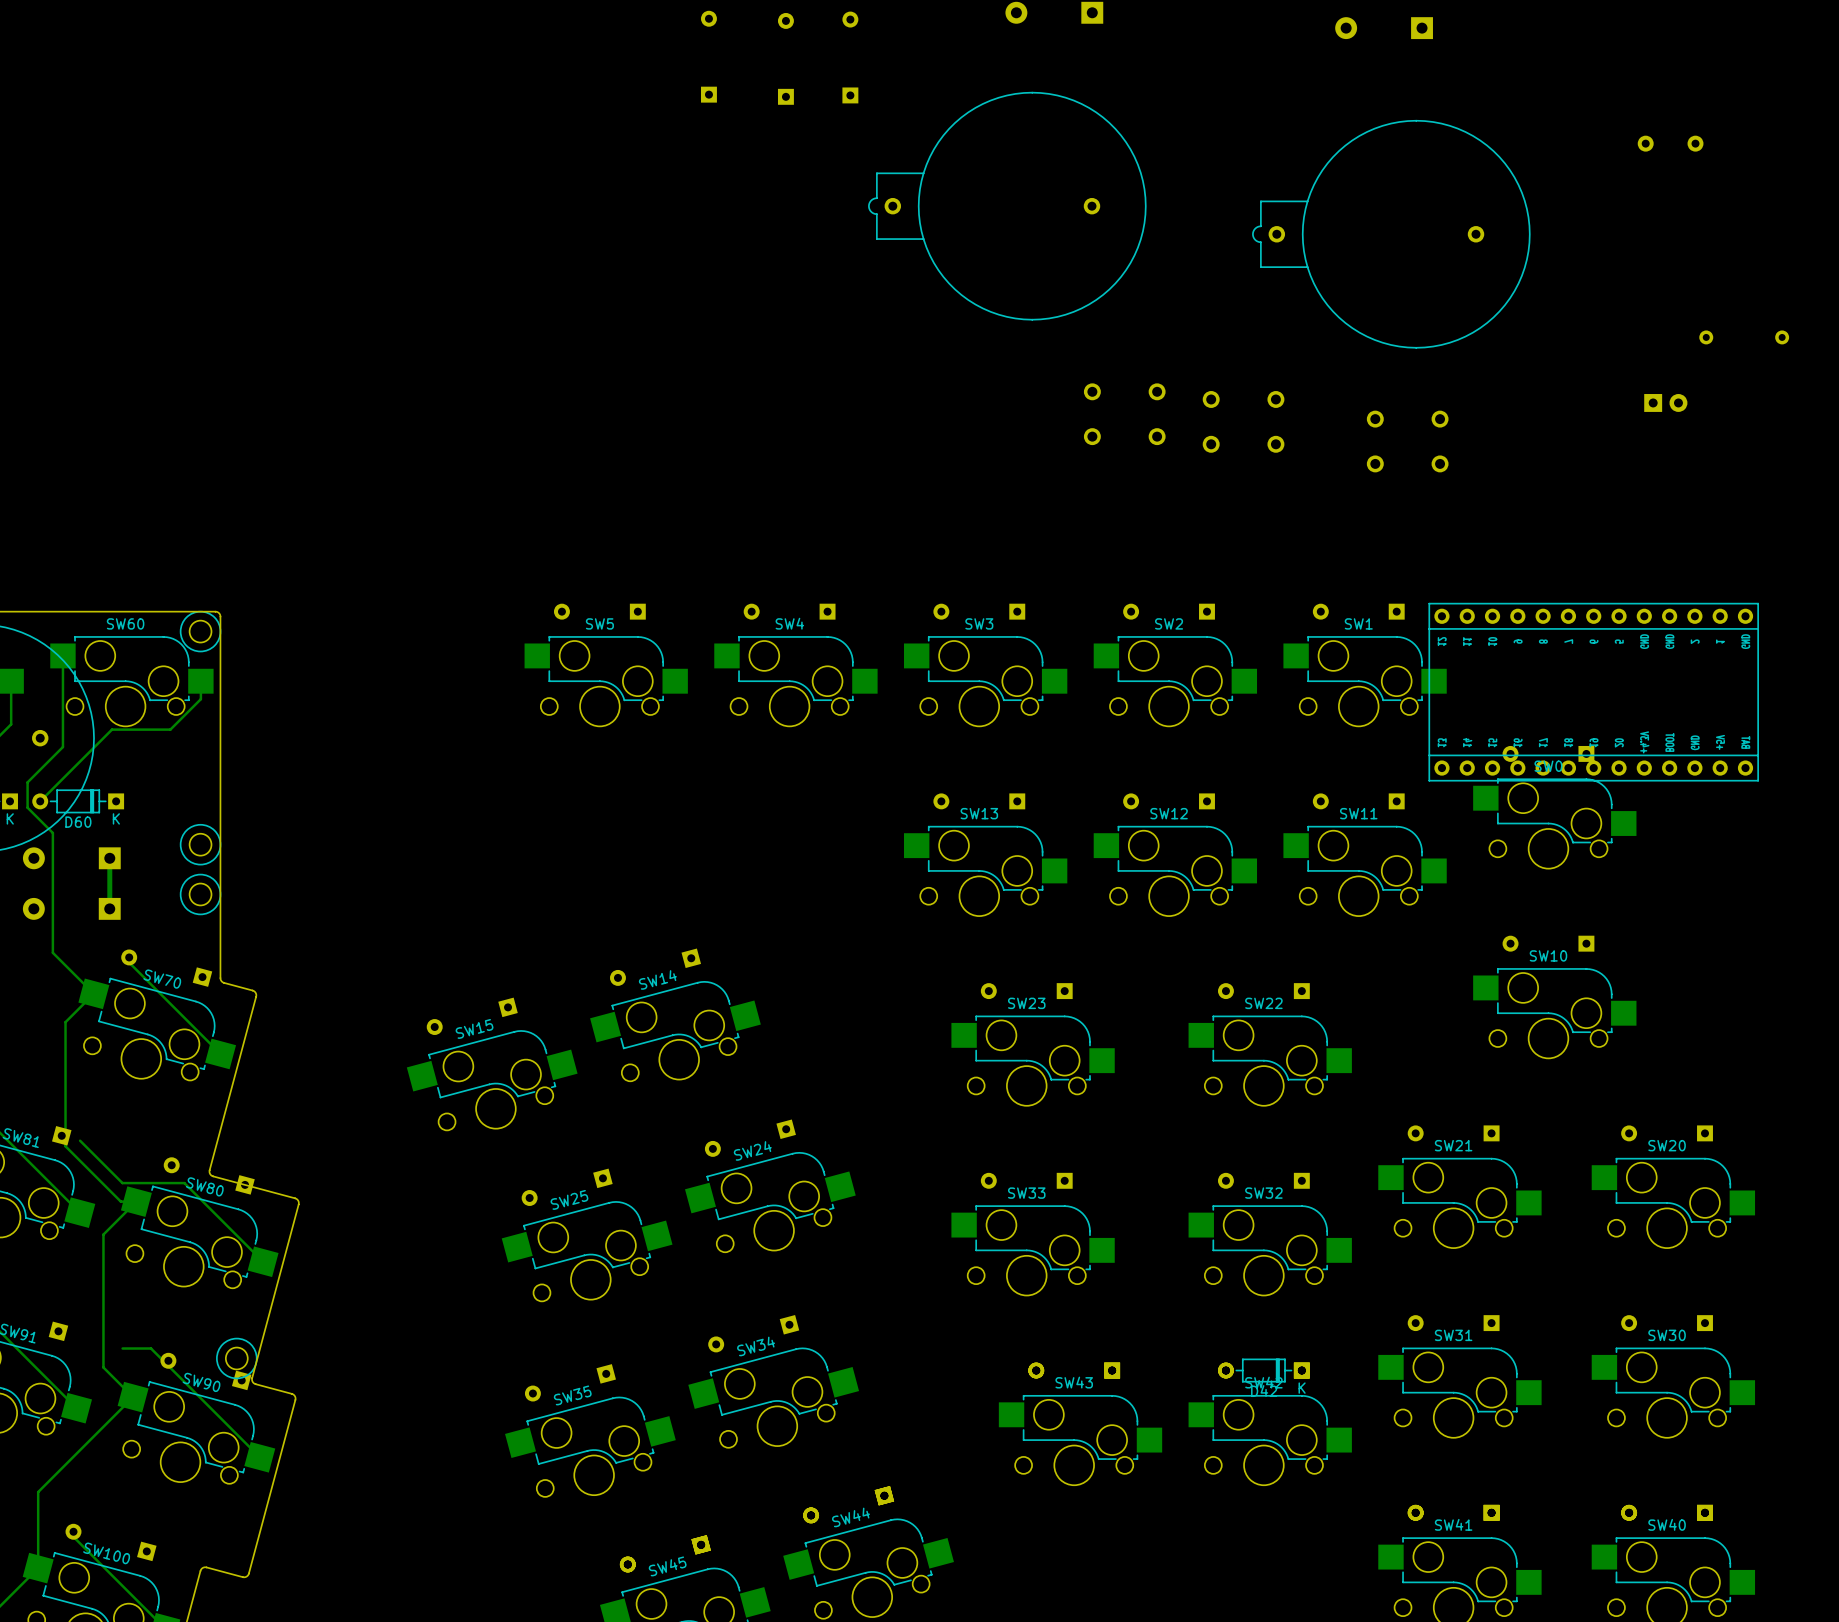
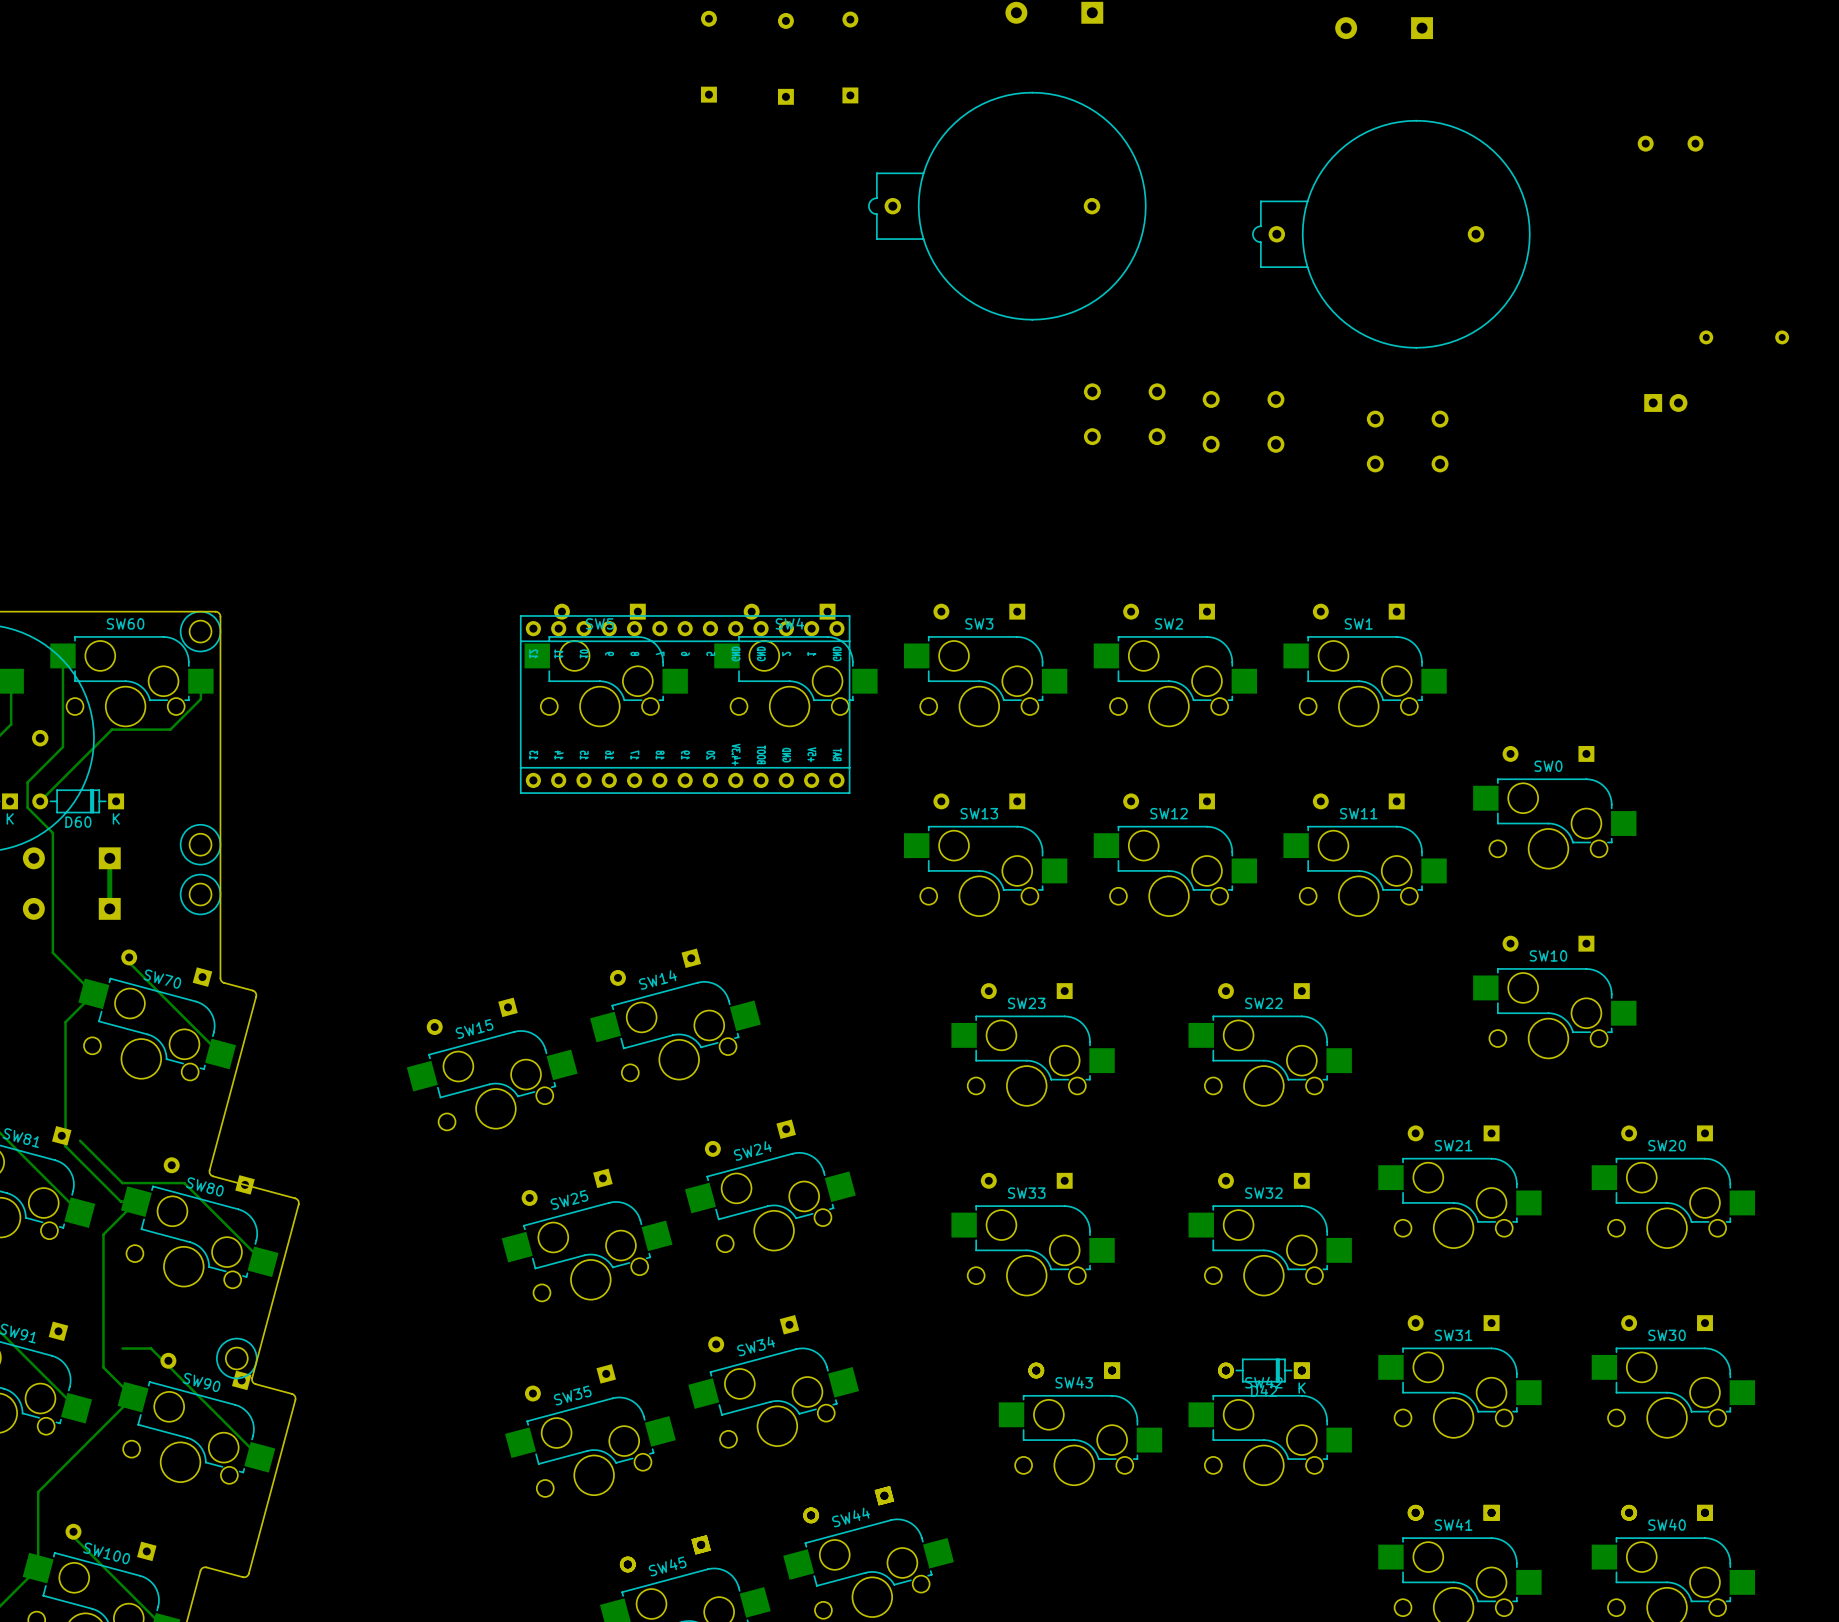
part: (1593, 692) -> none
part: none -> (685, 704)

